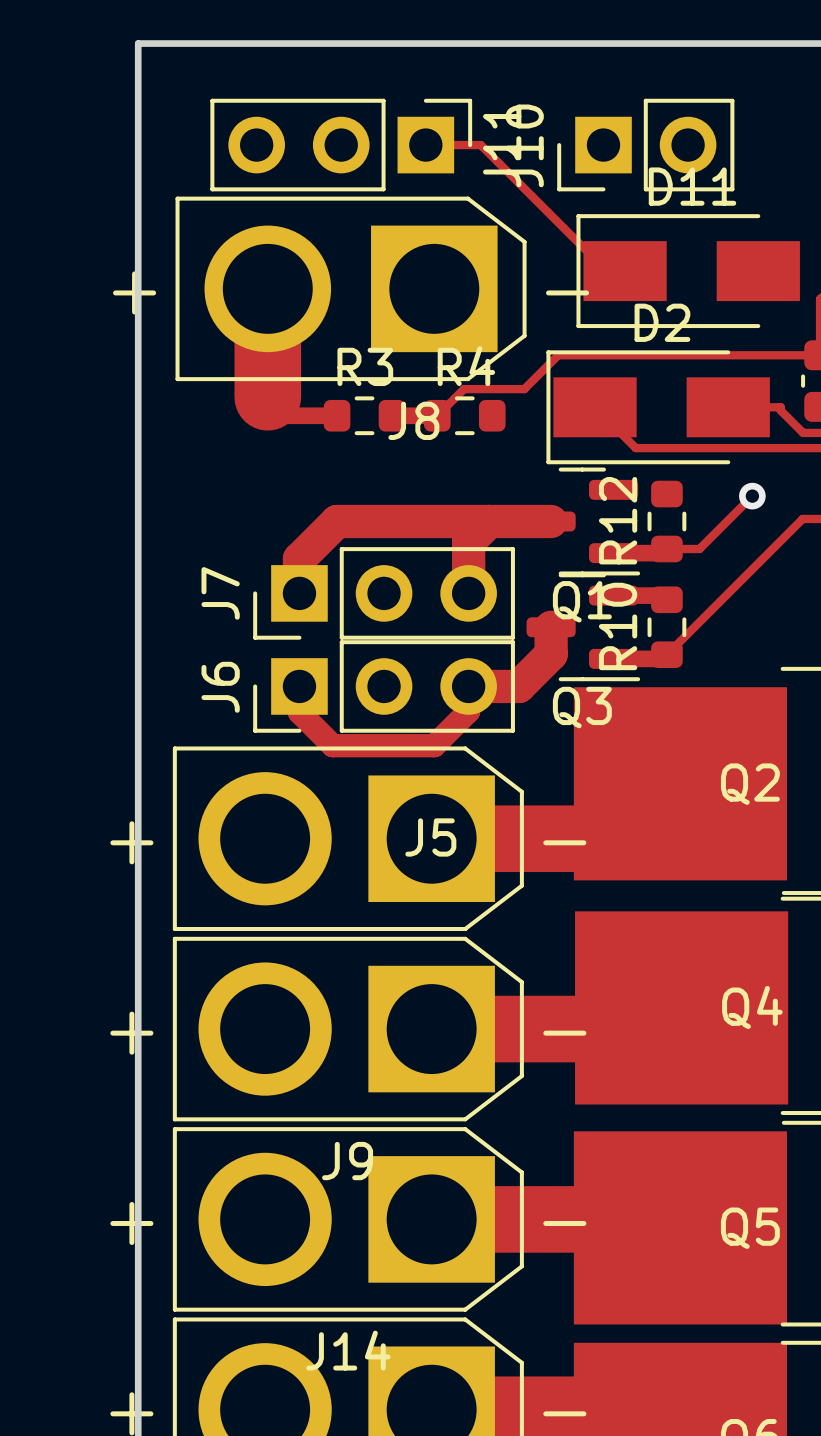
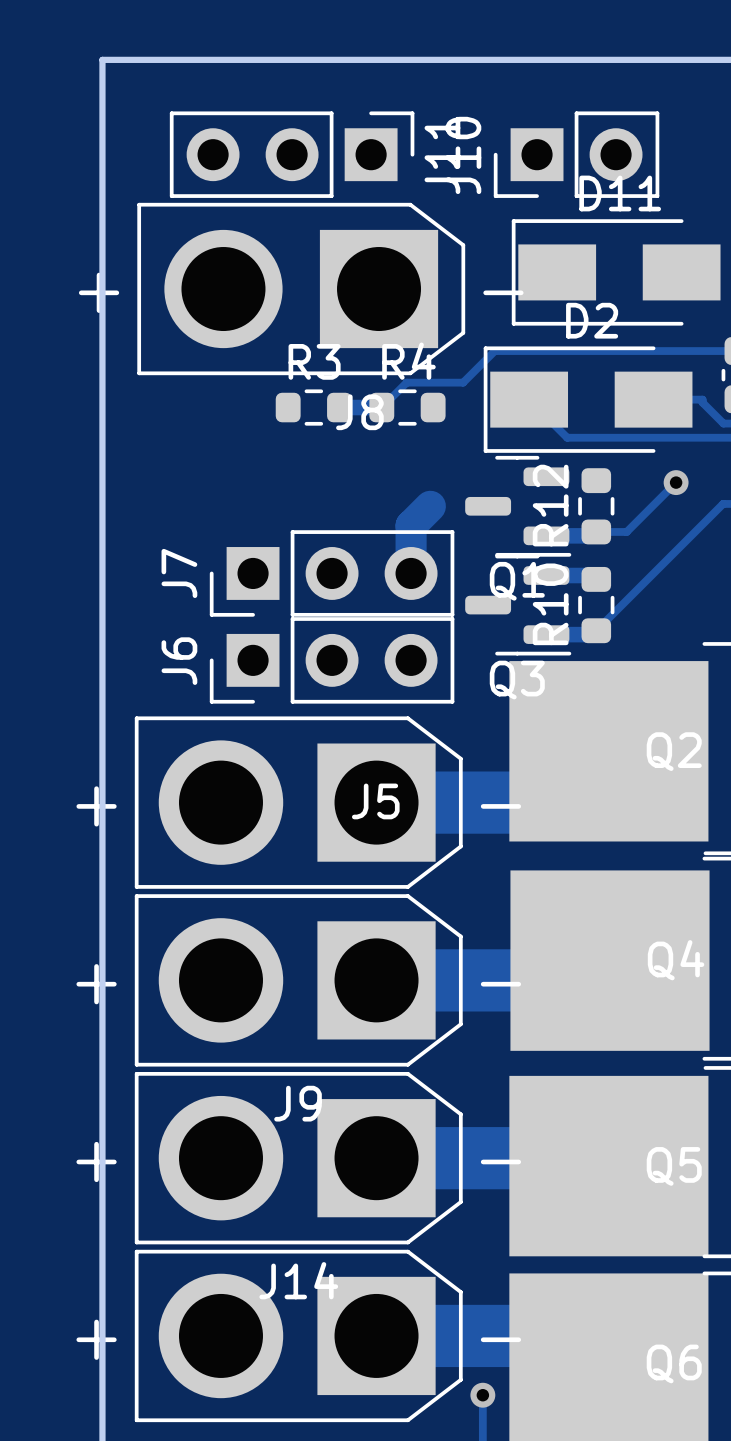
track: (425, 145) (480, 145) (606, 271) (625, 271) -> none
track: (267, 288) (267, 397) (286, 415) (337, 415) -> none
track: (551, 521) (337, 521) (299, 559) (299, 593) -> none
track: (551, 627) (551, 654) (518, 686) (468, 686) (468, 711) (434, 745) (332, 745) (299, 712) (299, 686) -> none

